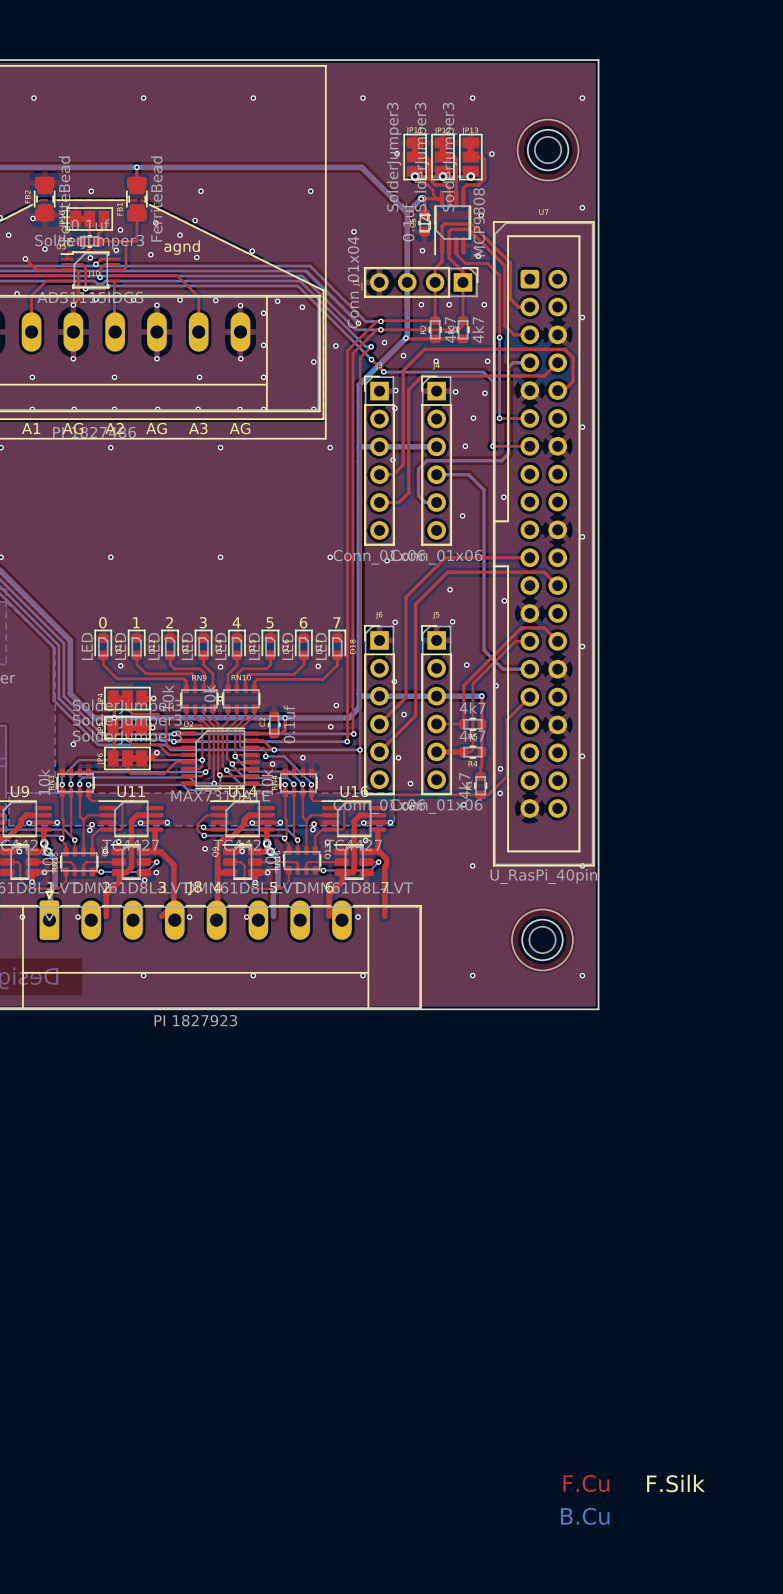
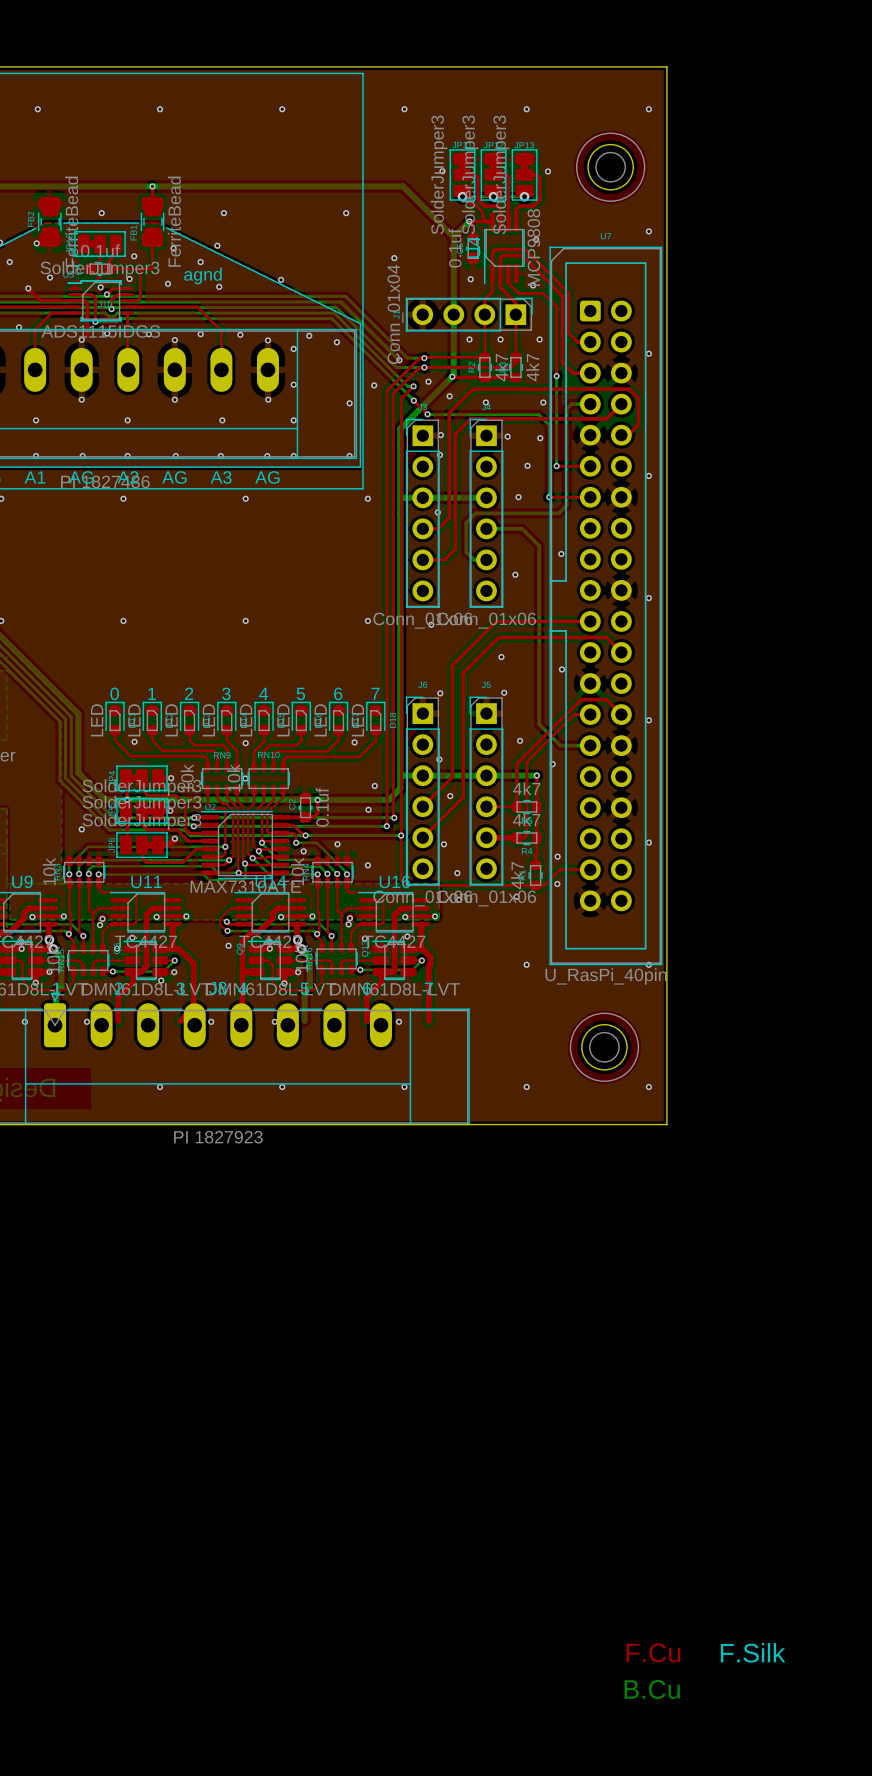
top track: (529, 697) (506, 720) (506, 776) (502, 780) -> (590, 869) (560, 869)

